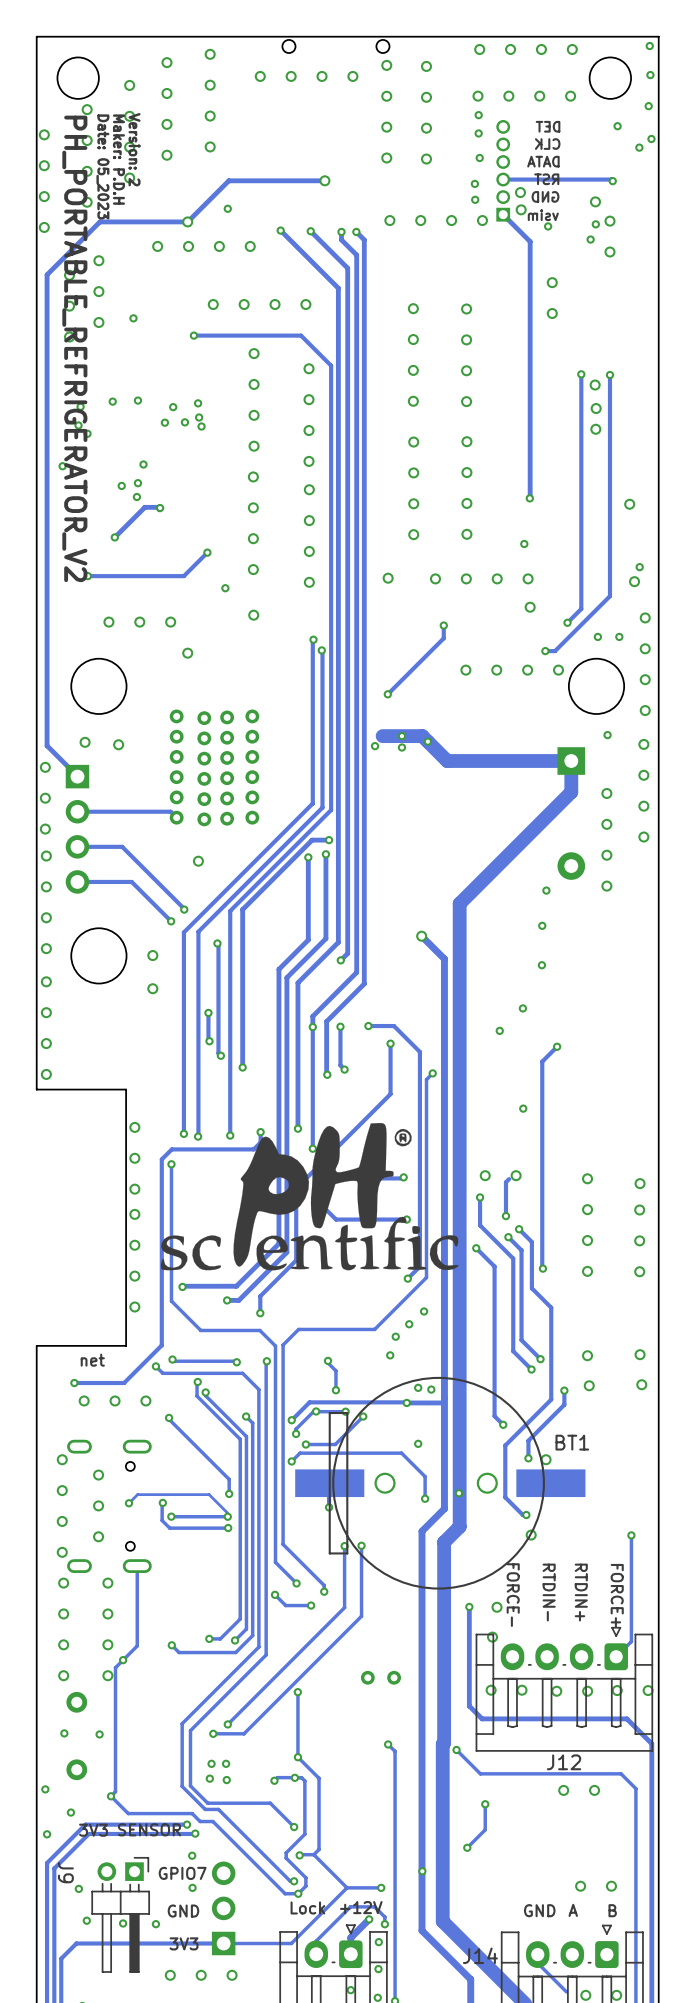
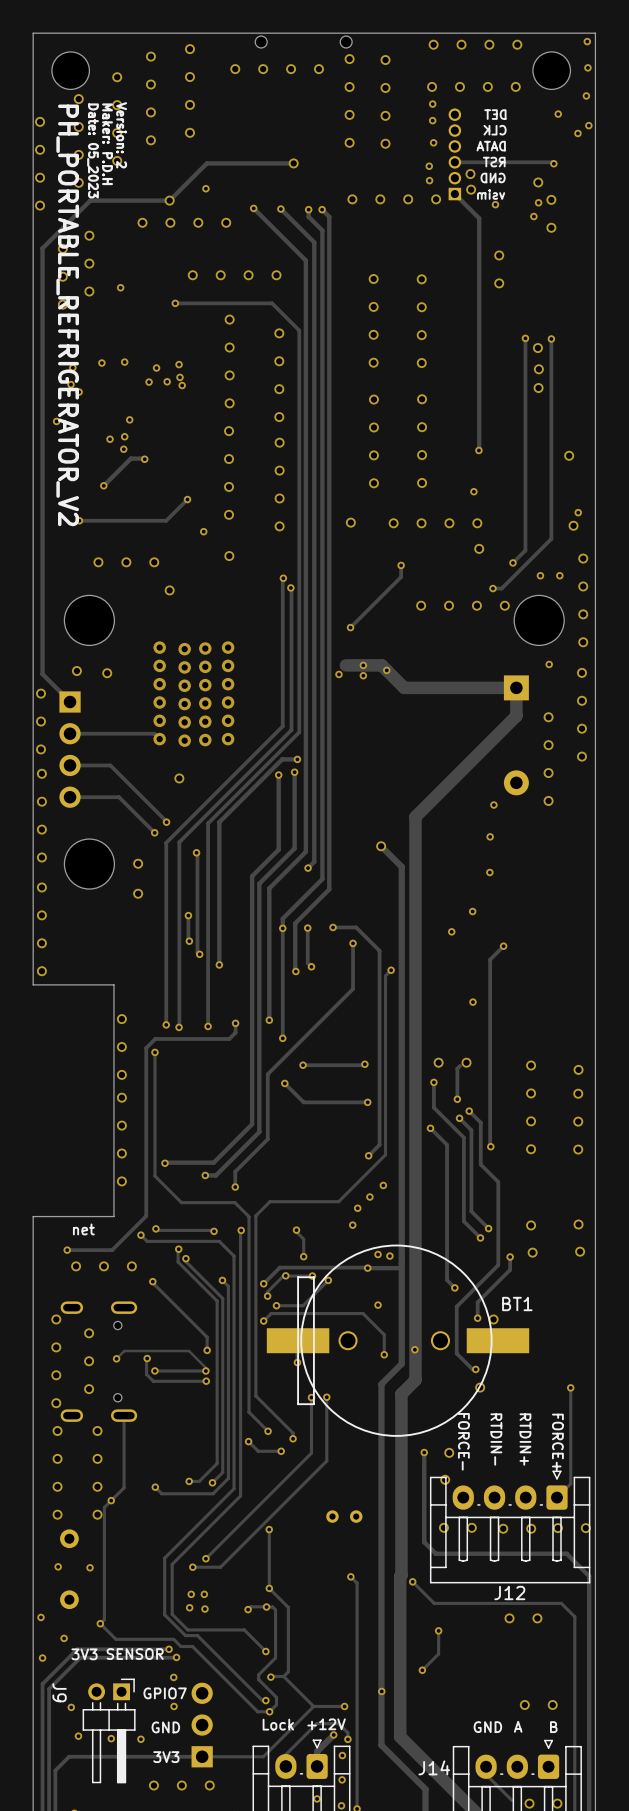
drawing: [160, 1123, 459, 1271] -> none

